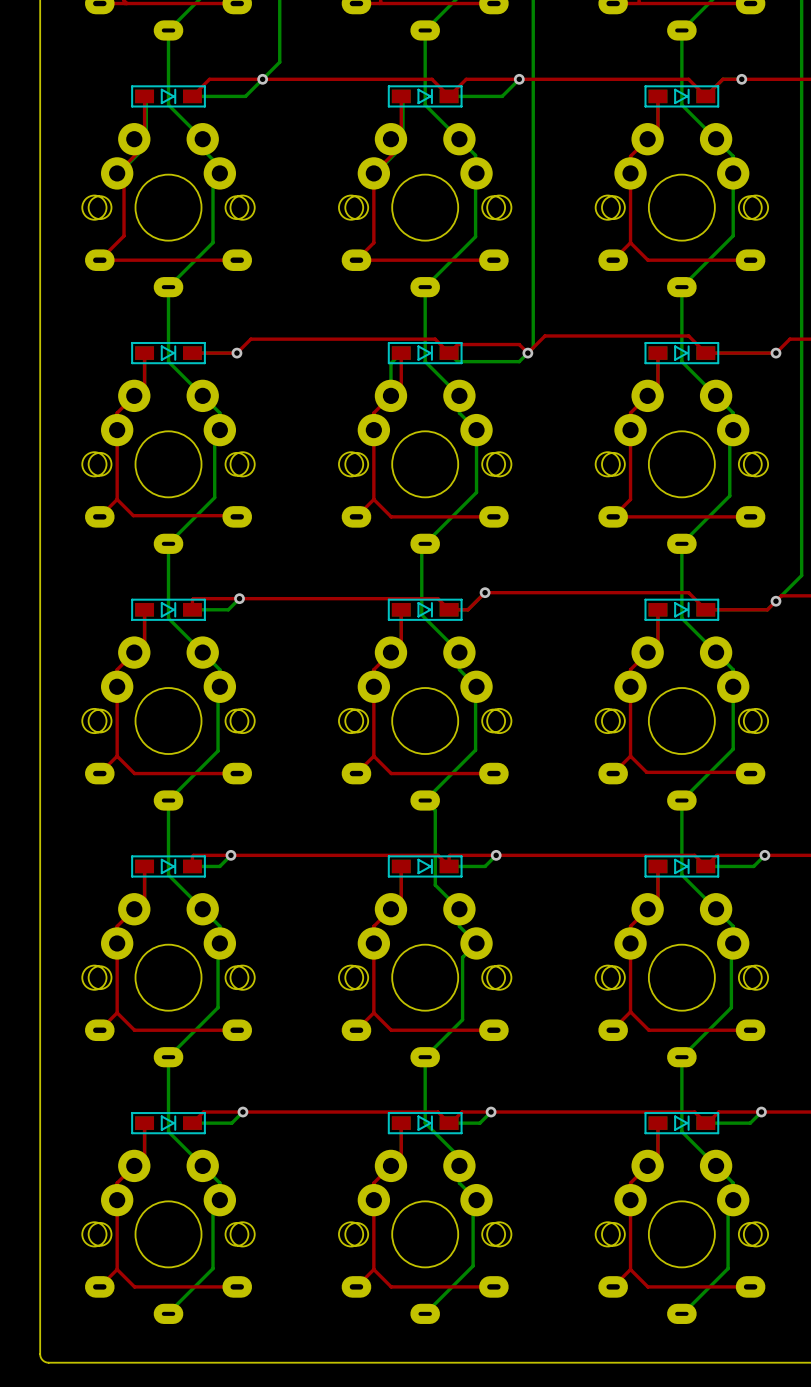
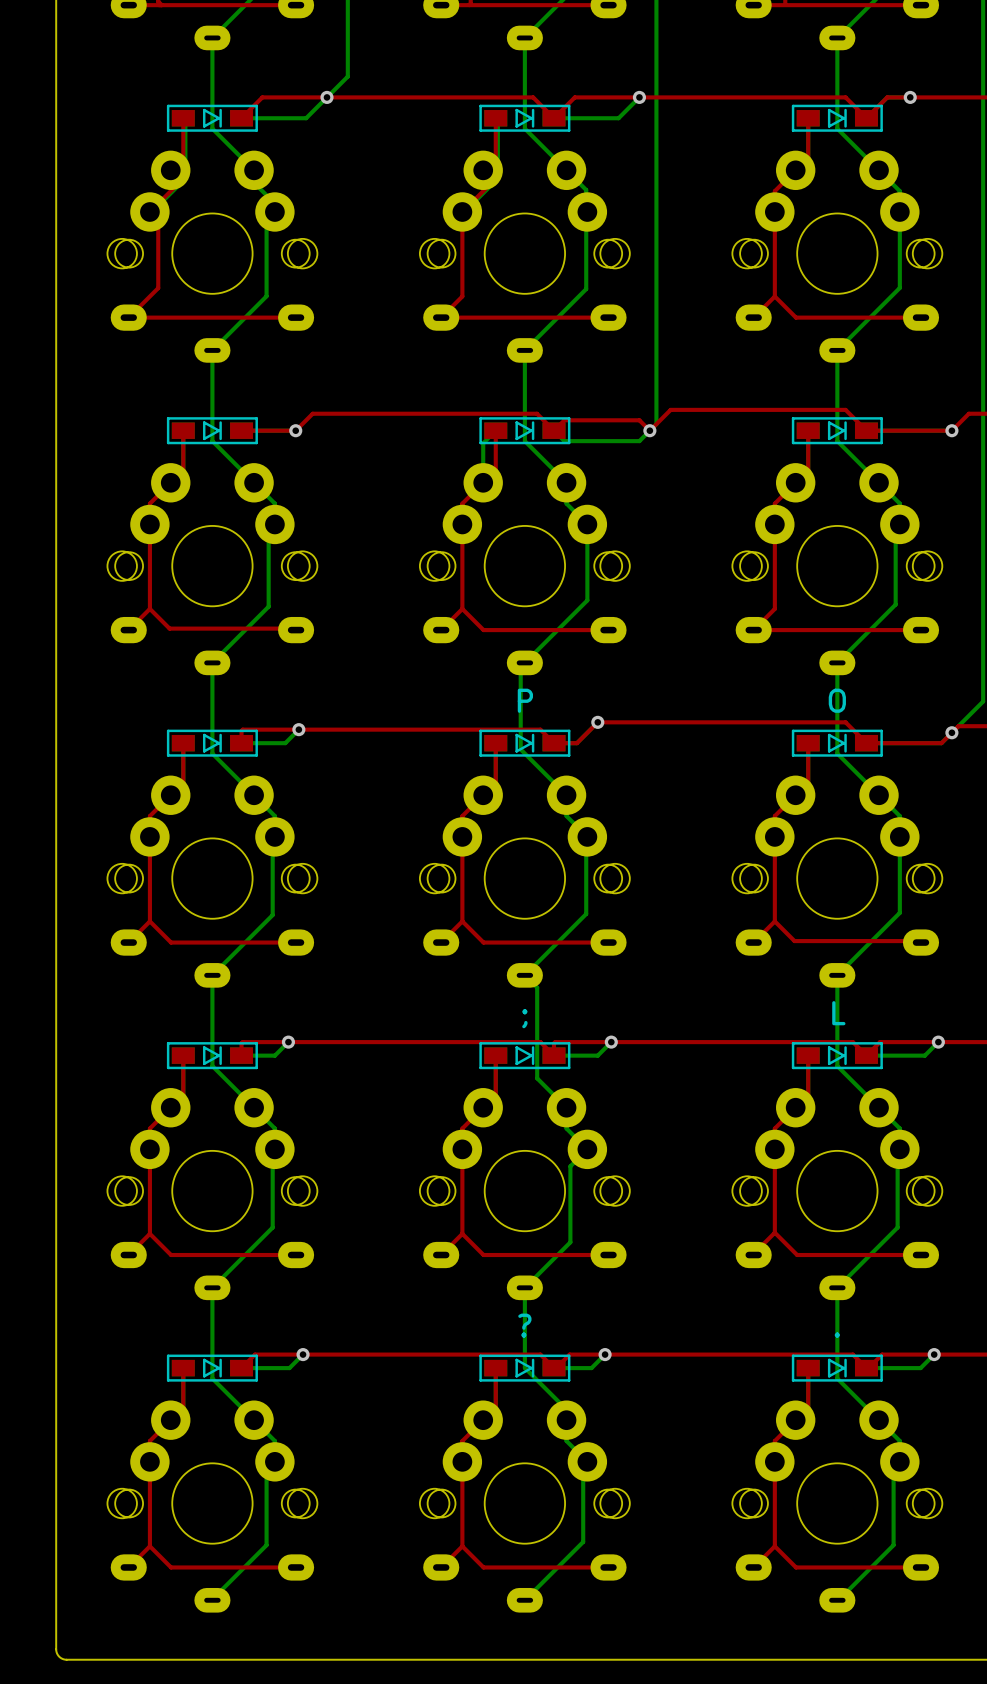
text: none -> P (525, 700)
text: none -> O (837, 700)
text: none -> L (838, 1013)
text: none -> ; (524, 1018)
text: none -> ? (524, 1325)
text: none -> . (837, 1335)

